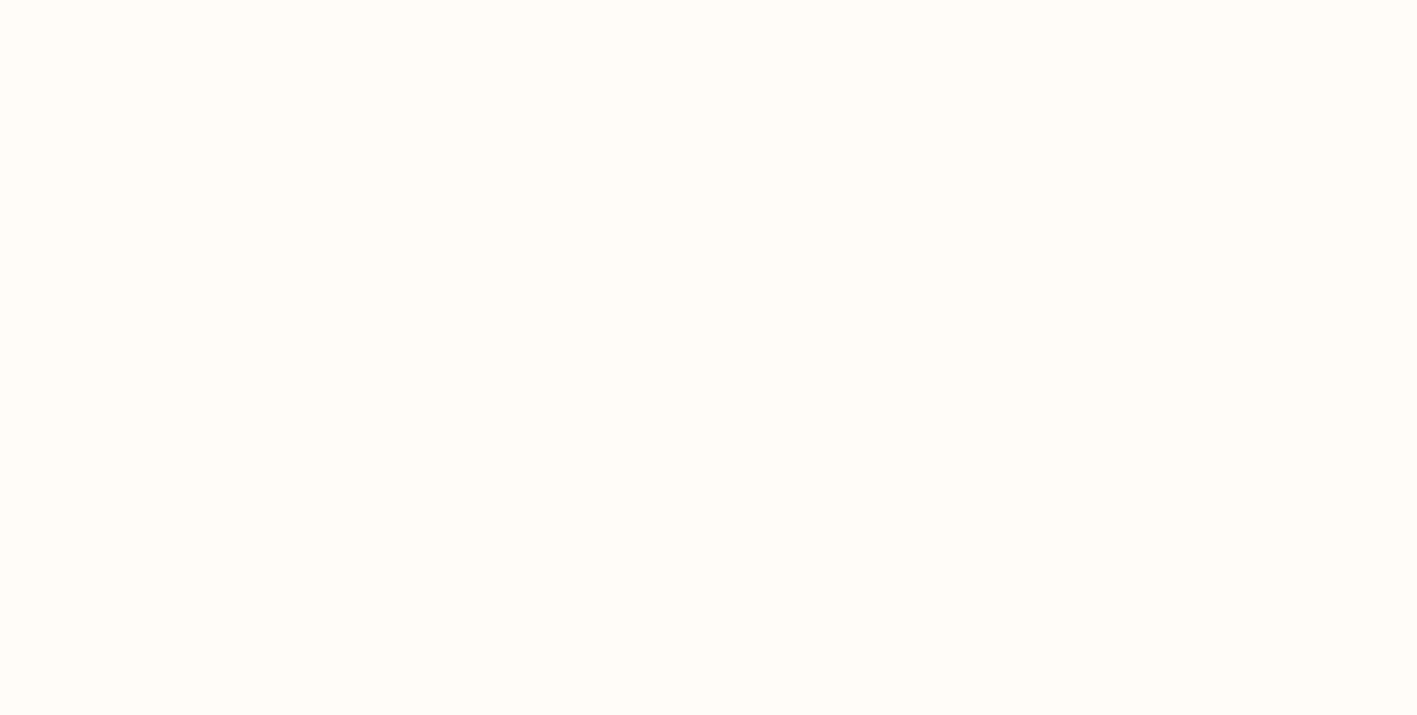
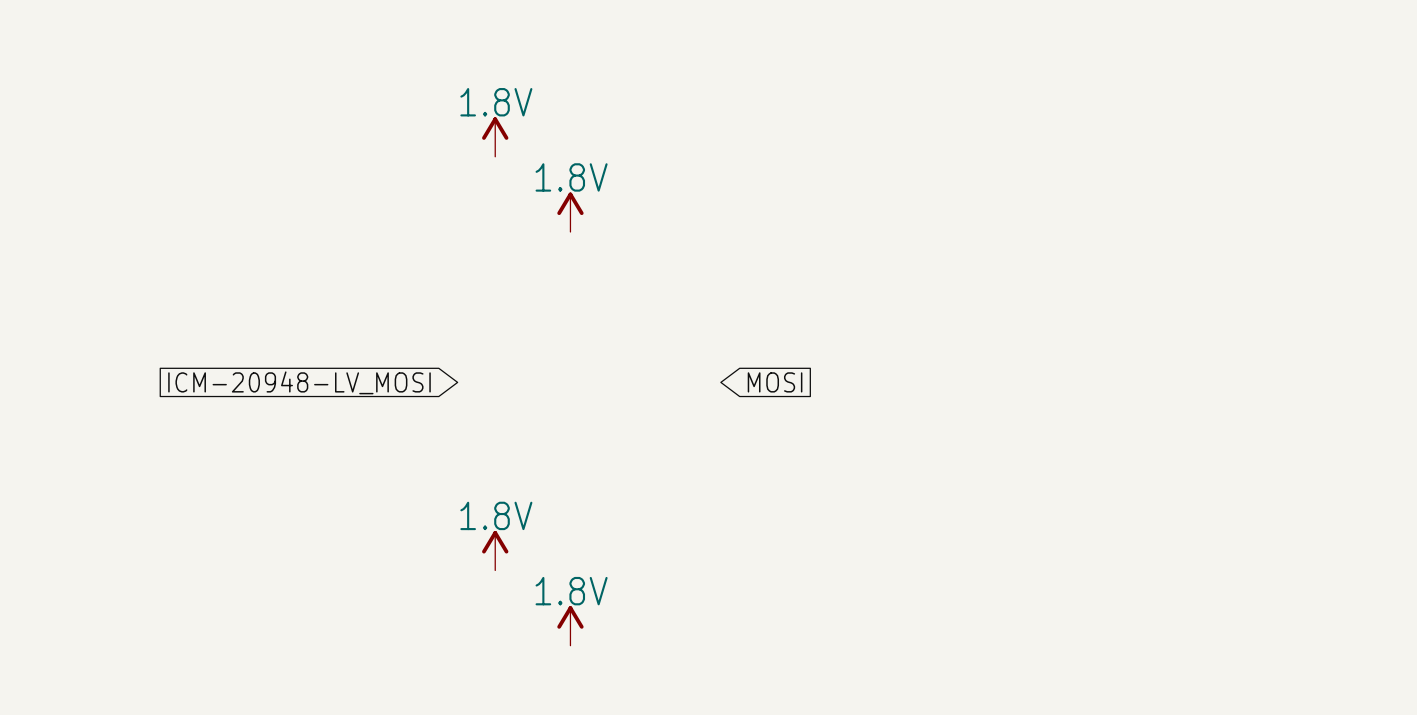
power symbol: none -> 1.8V (495, 137)
power symbol: none -> 1.8V (570, 212)
global label: none -> ICM-20948-LV_MOSI (299, 382)
global label: none -> MOSI (775, 382)
power symbol: none -> 1.8V (495, 550)
power symbol: none -> 1.8V (570, 625)

